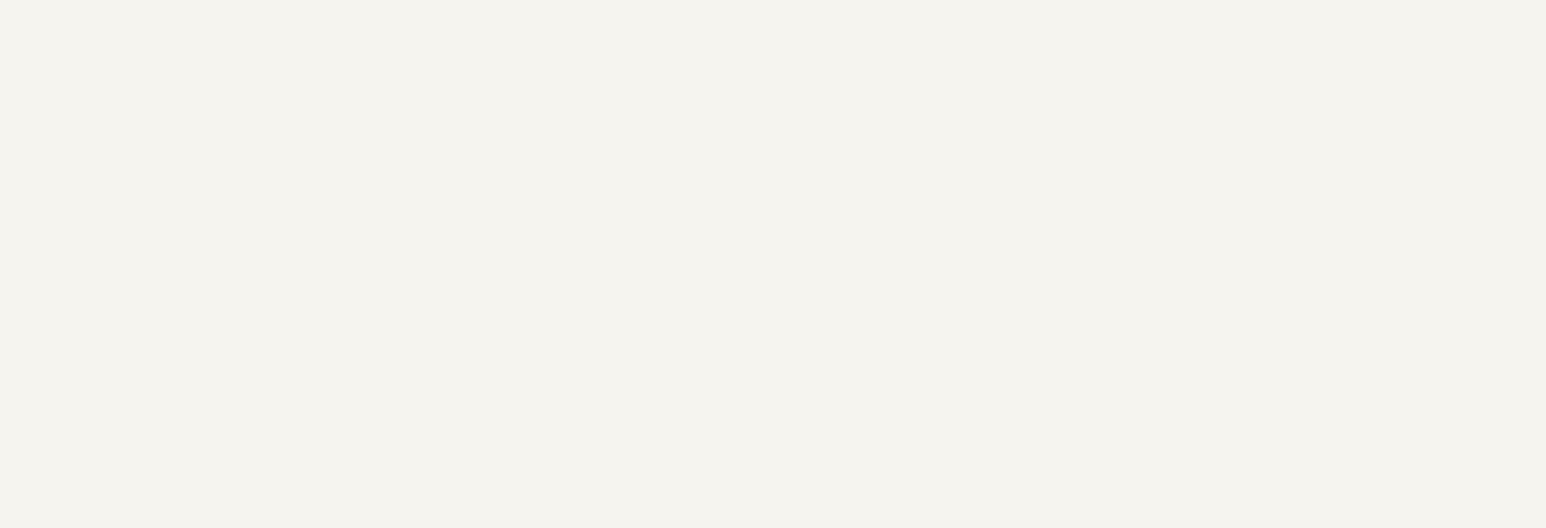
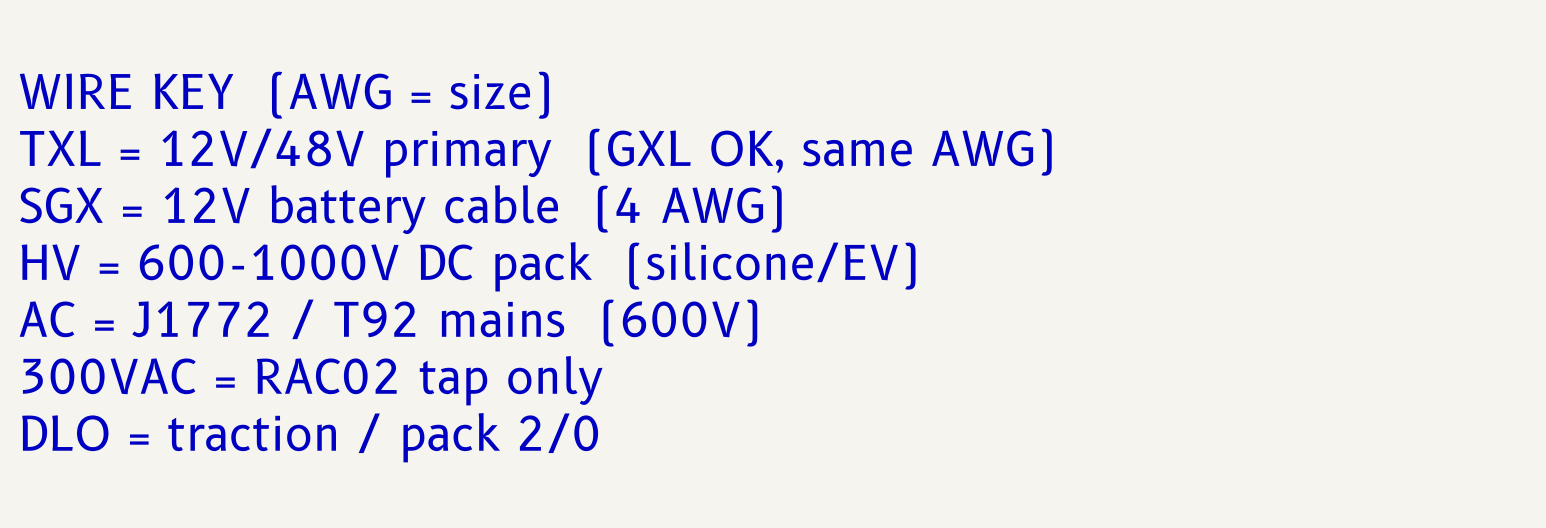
text: none -> WIRE KEY (AWG = size) (284, 95)
text: none -> TXL = 12V/48V primary (GXL OK, same AWG) (535, 153)
text: none -> SGX = 12V battery cable (4 AWG) (400, 209)
text: none -> HV = 600-1000V DC pack (silicone/EV) (468, 266)
text: none -> AC = J1772 / T92 mains (600V) (388, 323)
text: none -> 300VAC = RAC02 tap only (312, 380)
text: none -> DLO = traction / pack 2/0 (310, 437)

